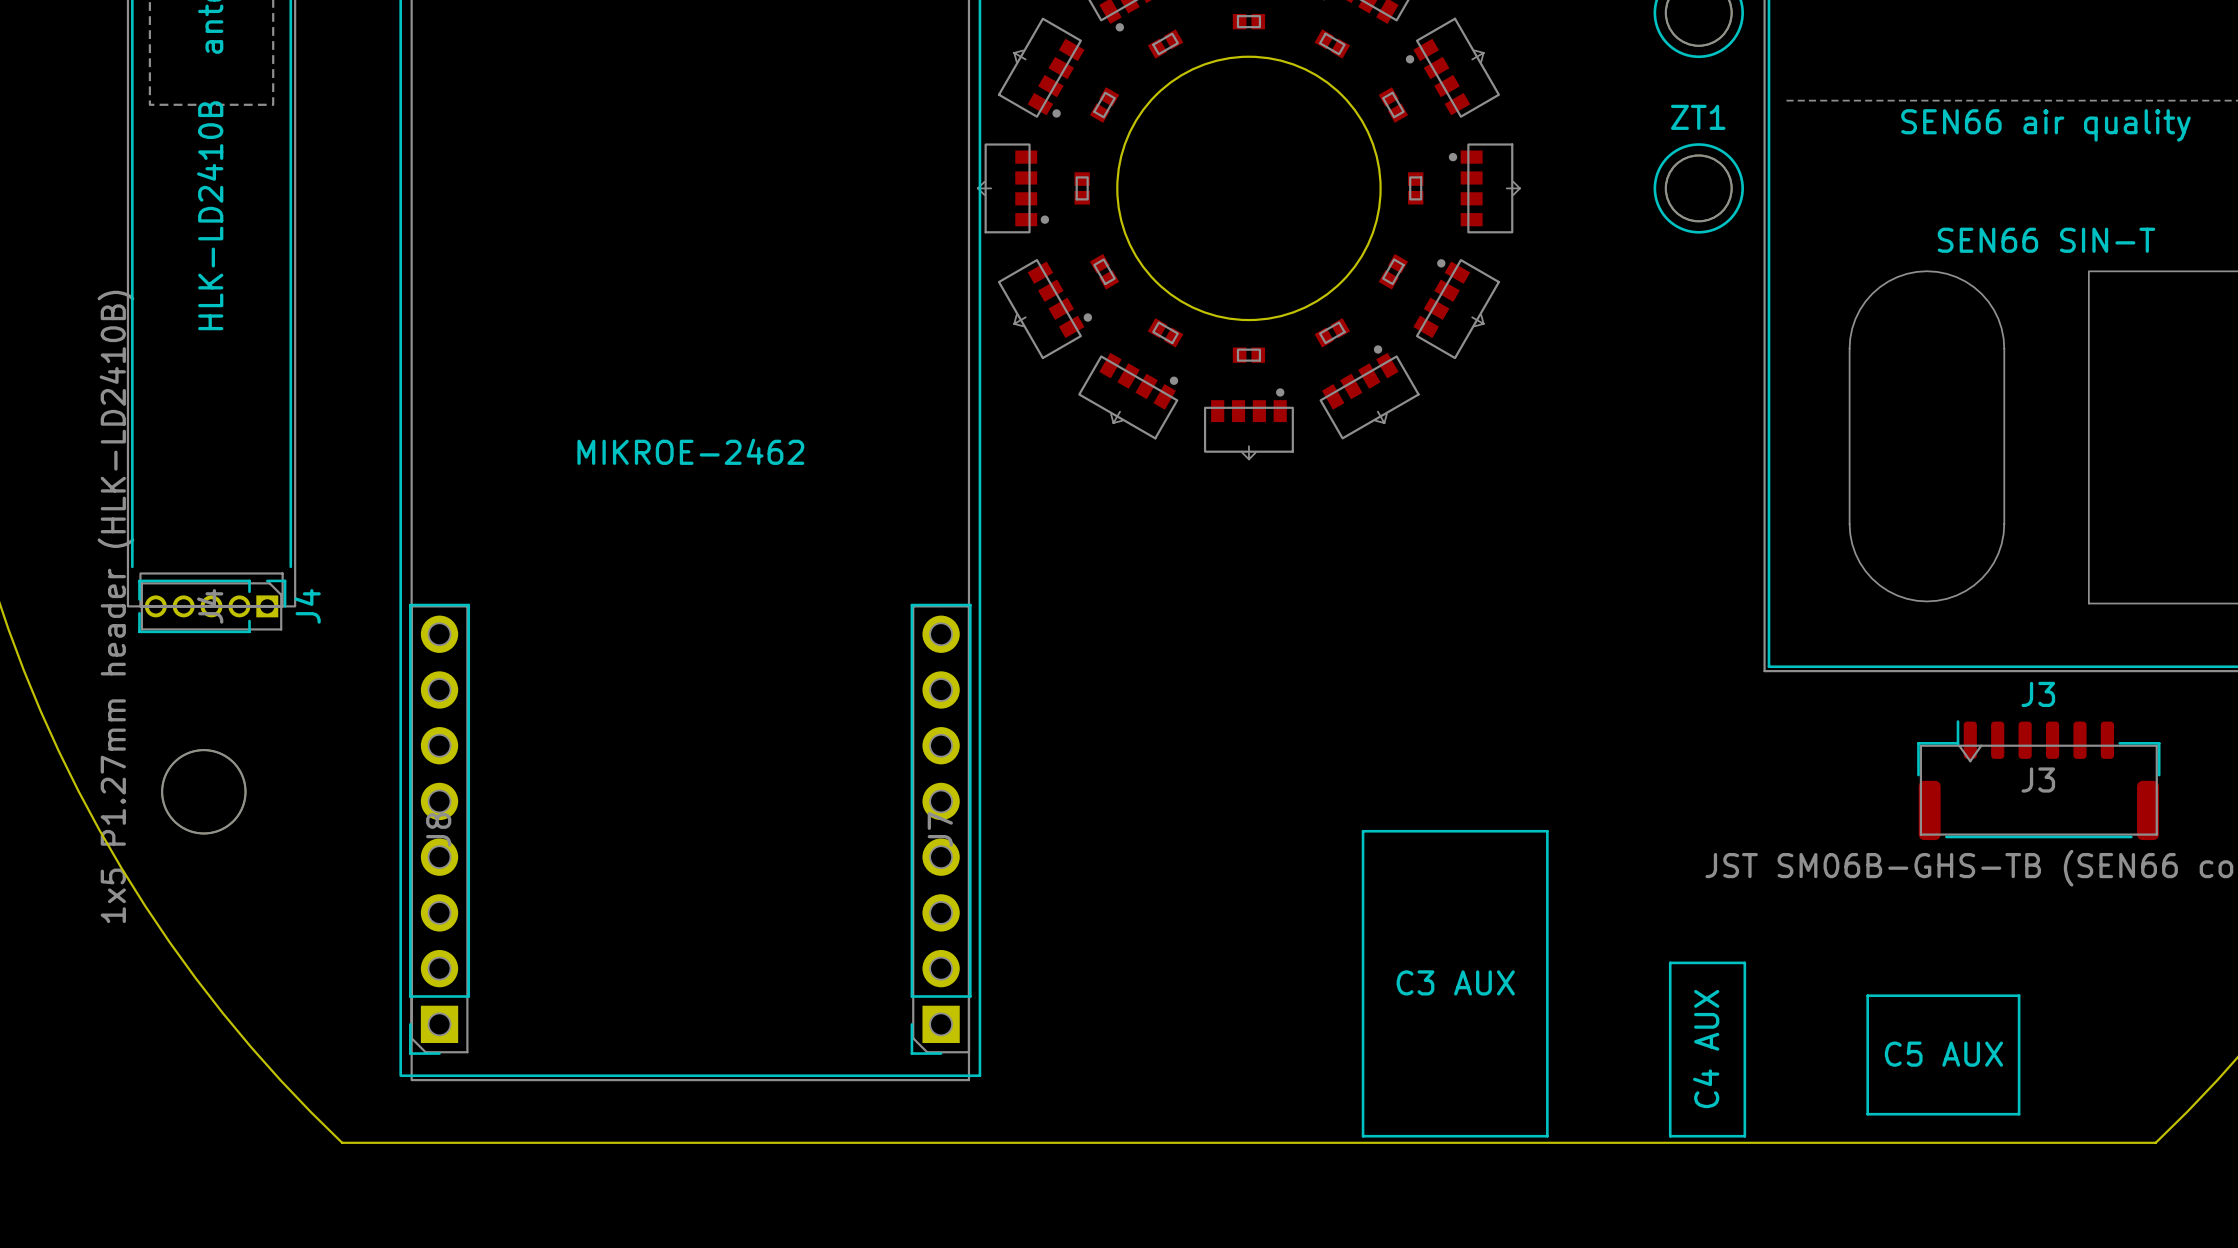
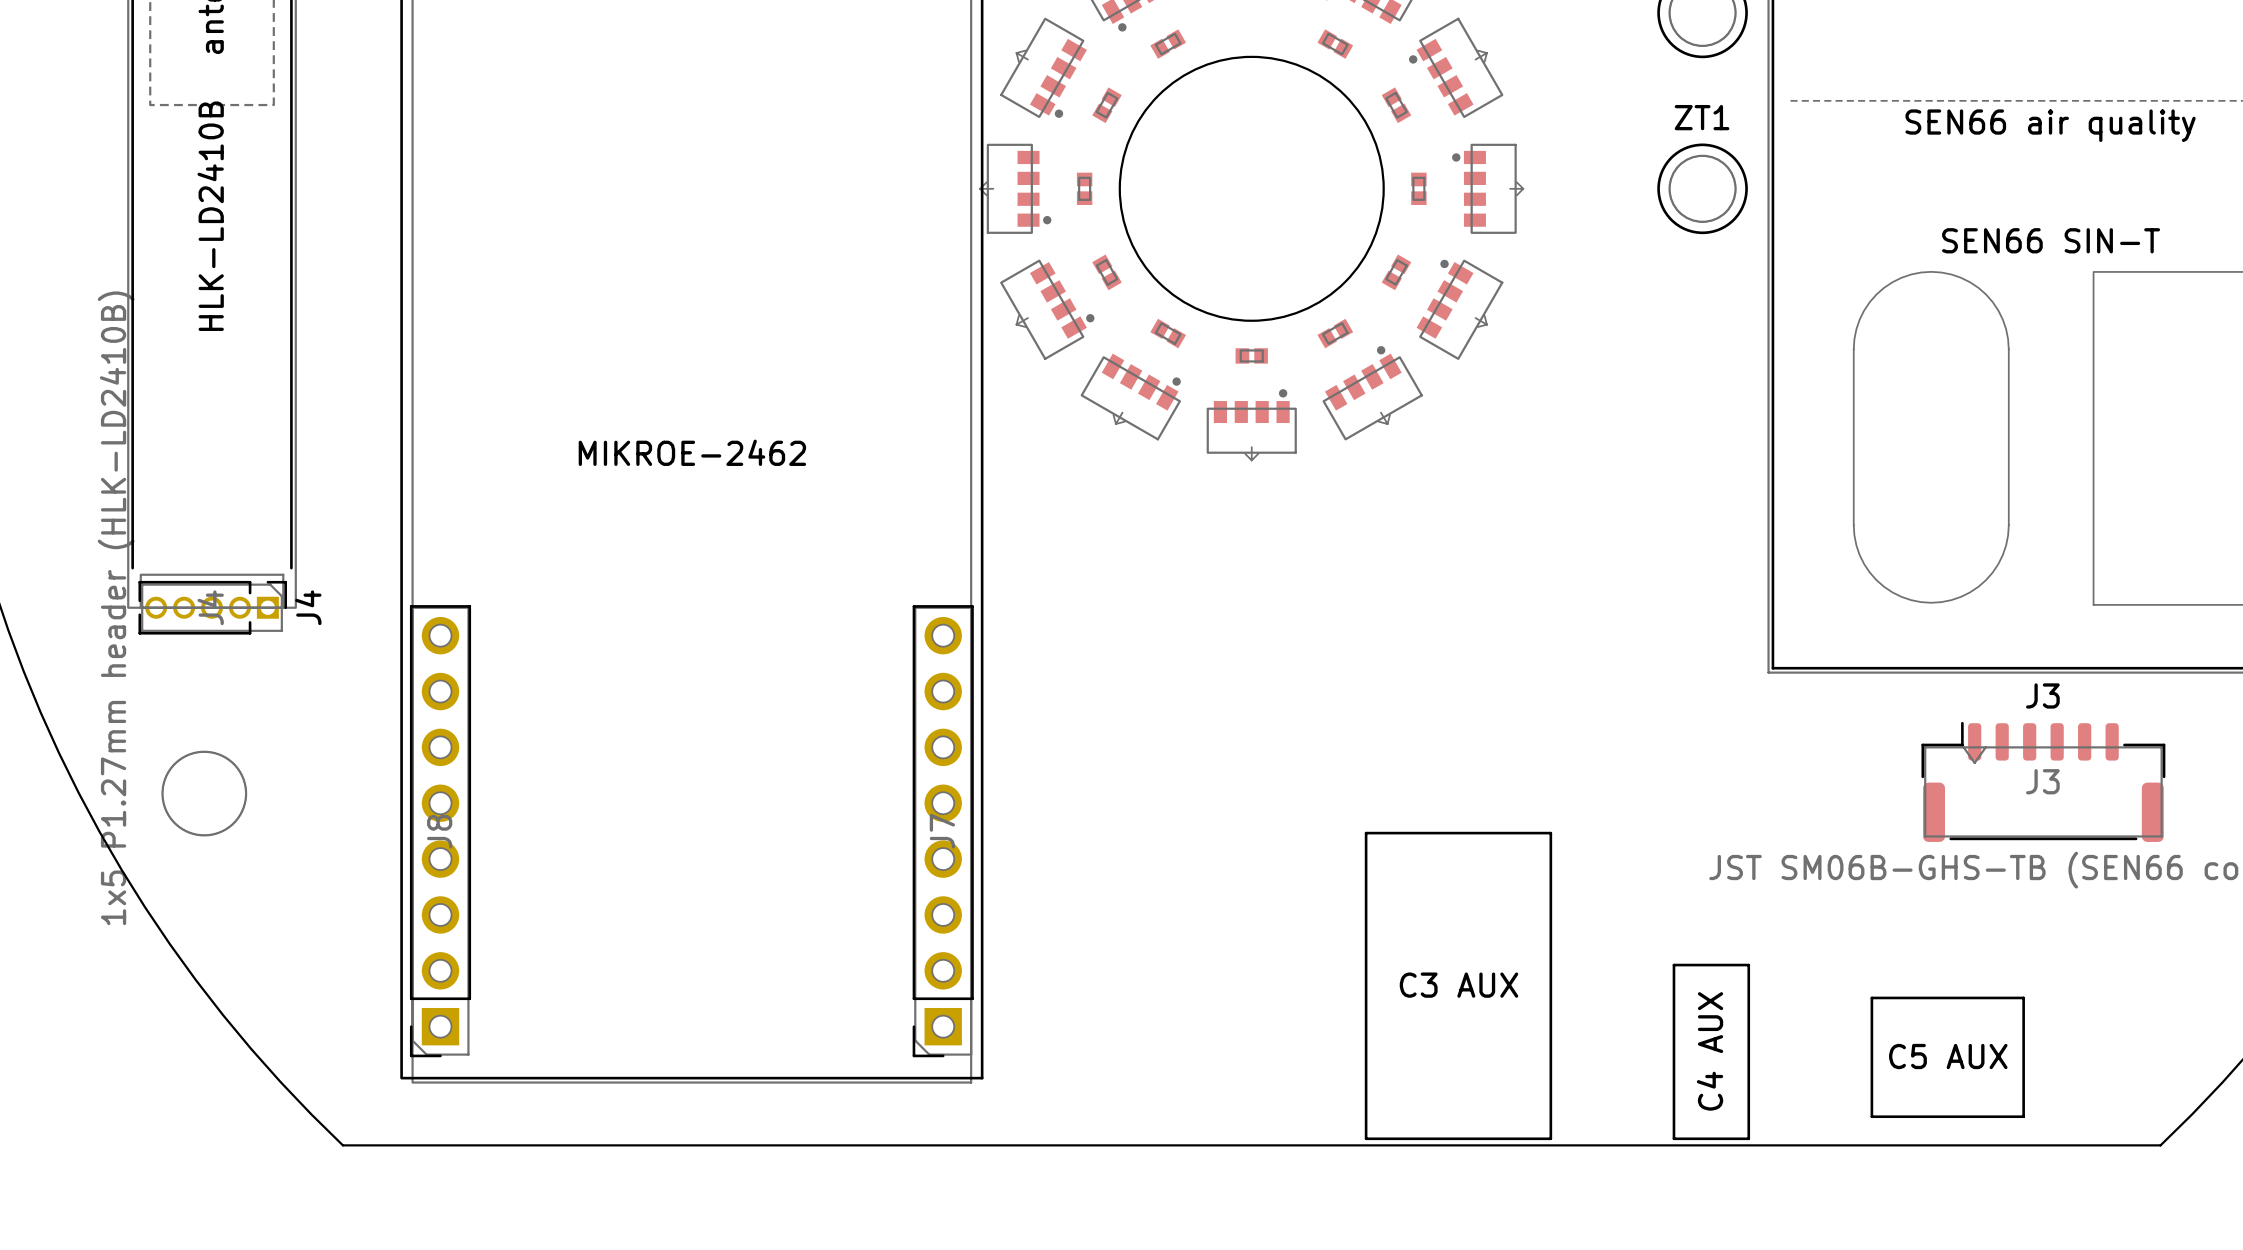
part: (1248, 21) -> none

